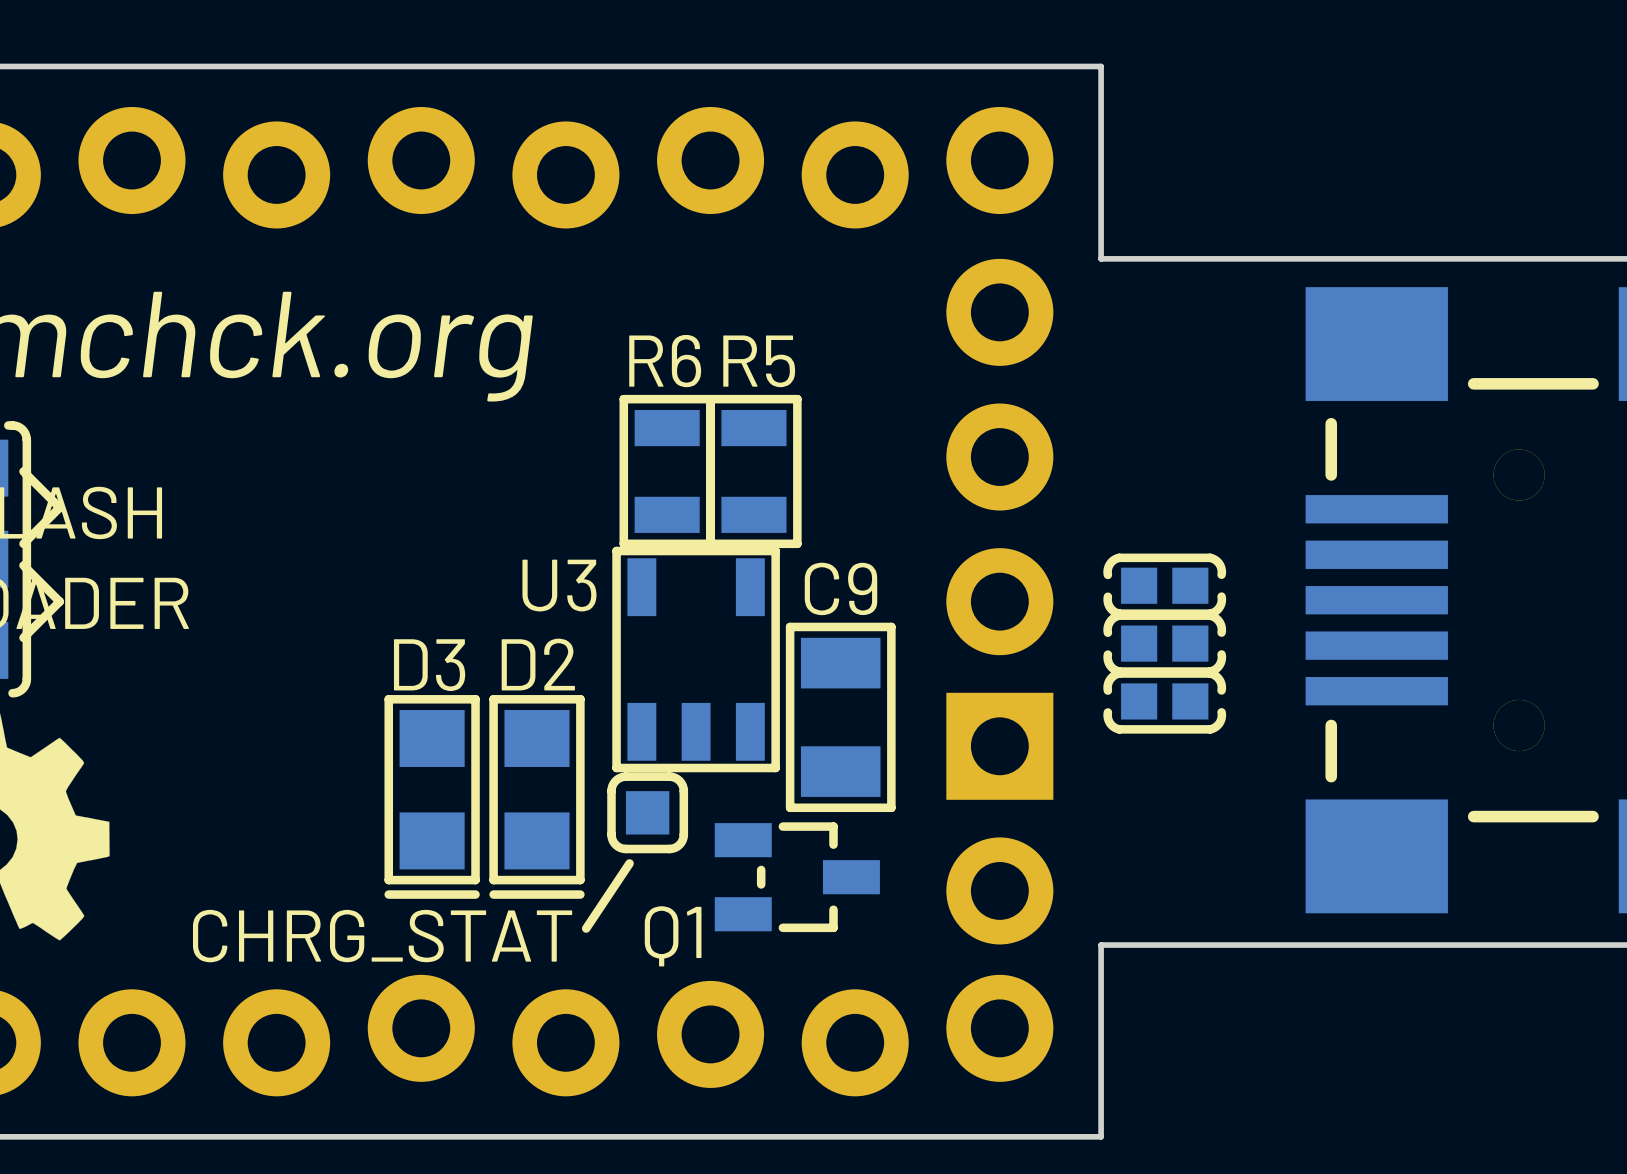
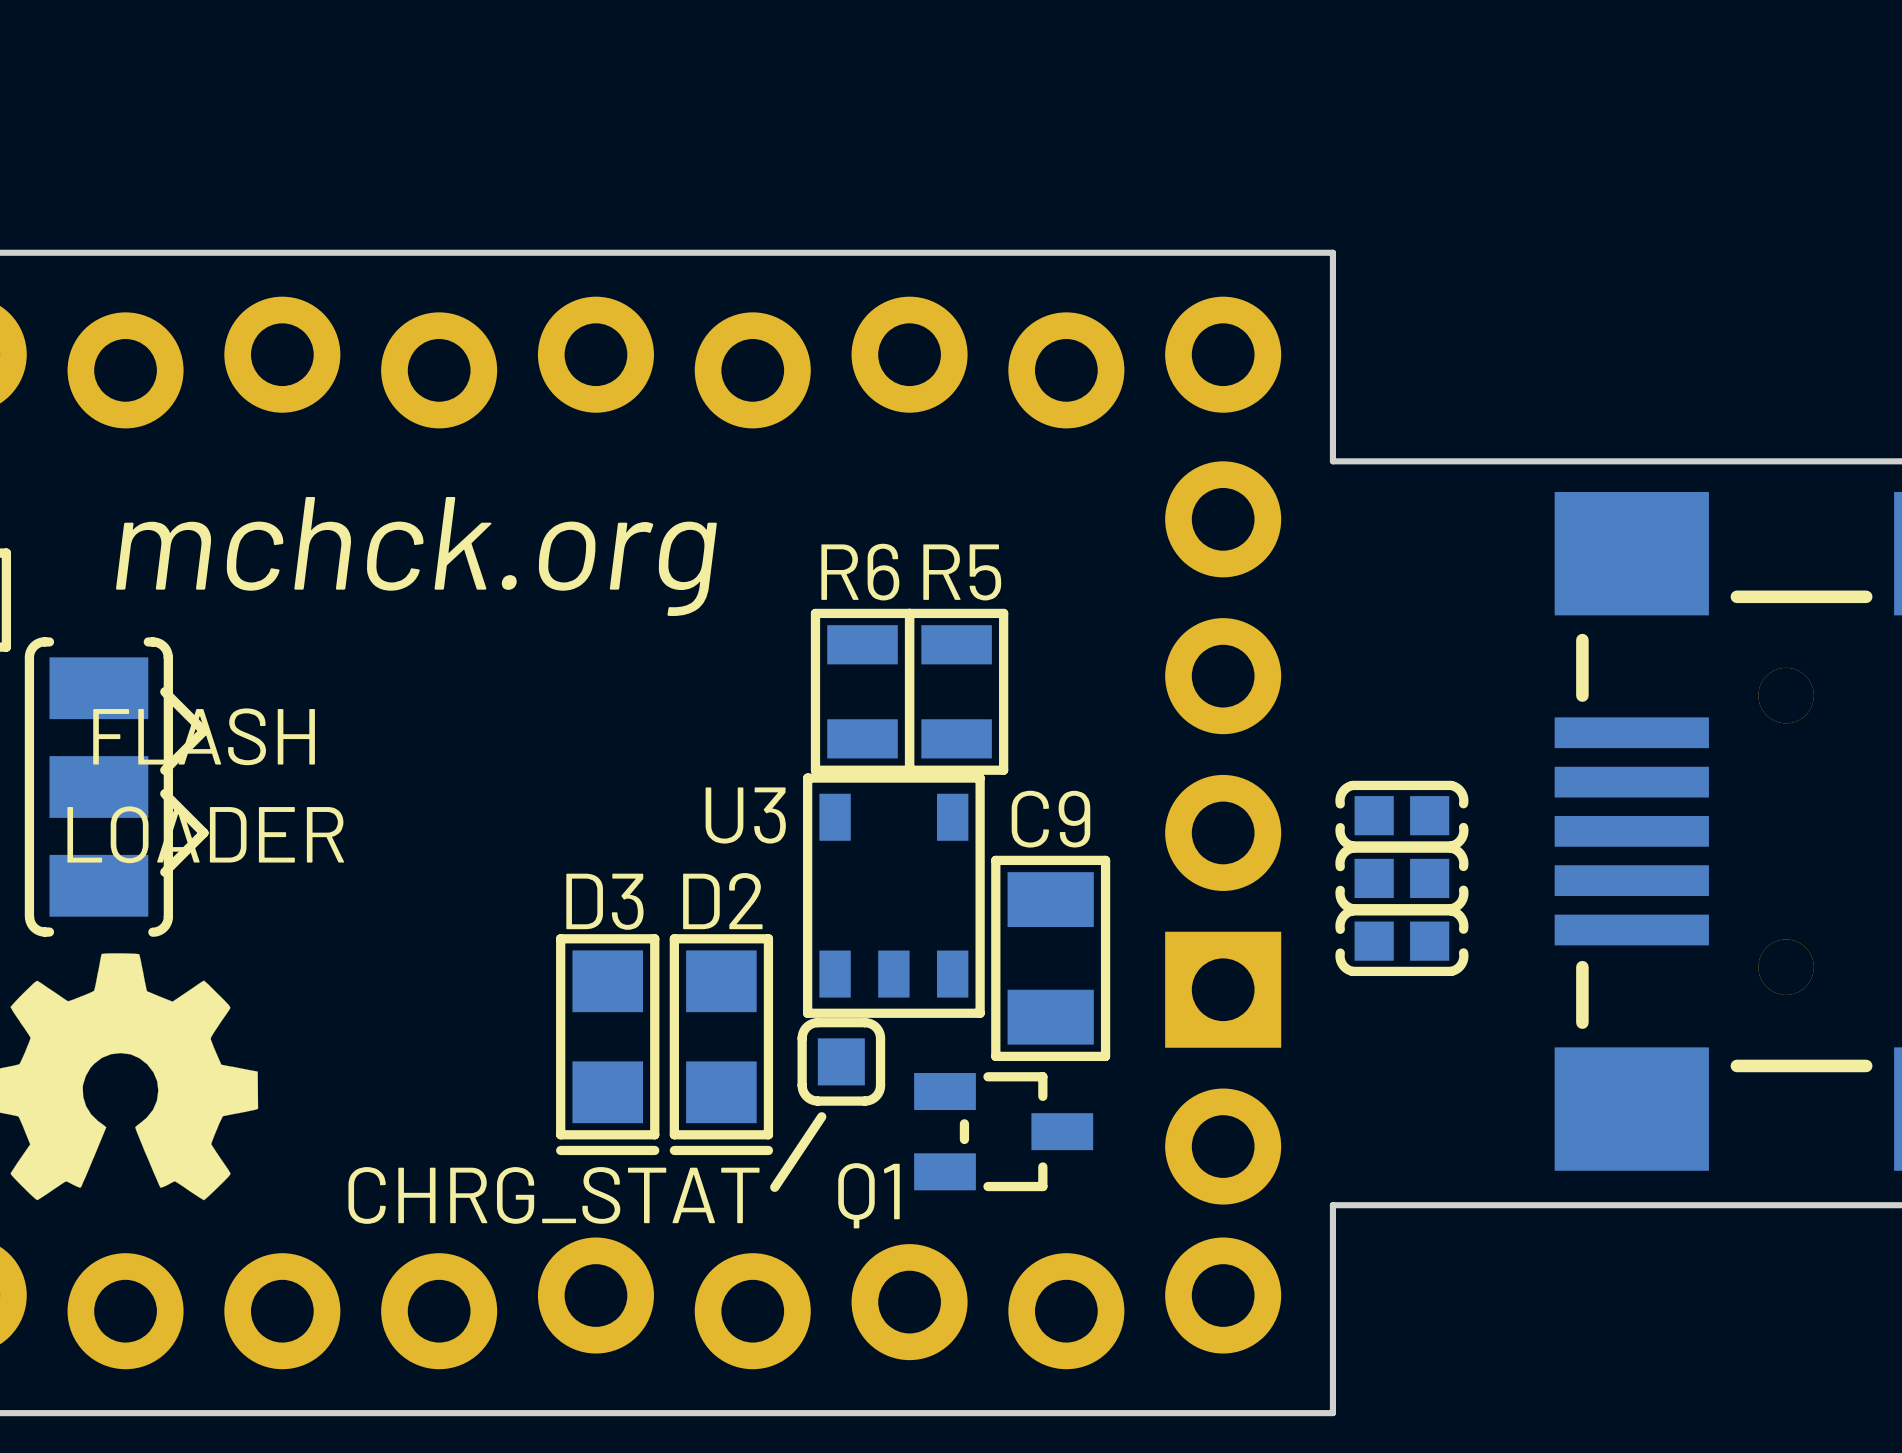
U3 footprint: [612, 546, 780, 773] -> [803, 773, 985, 1018]

